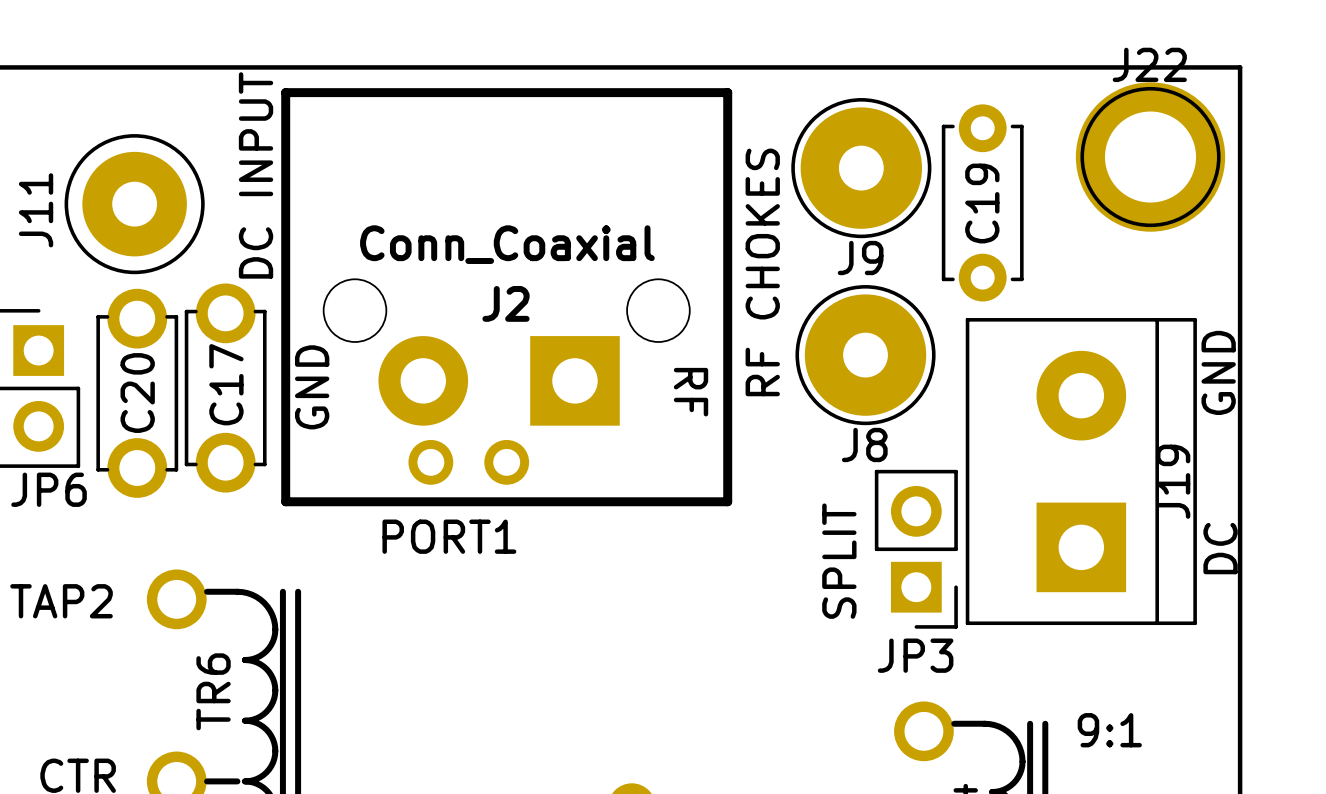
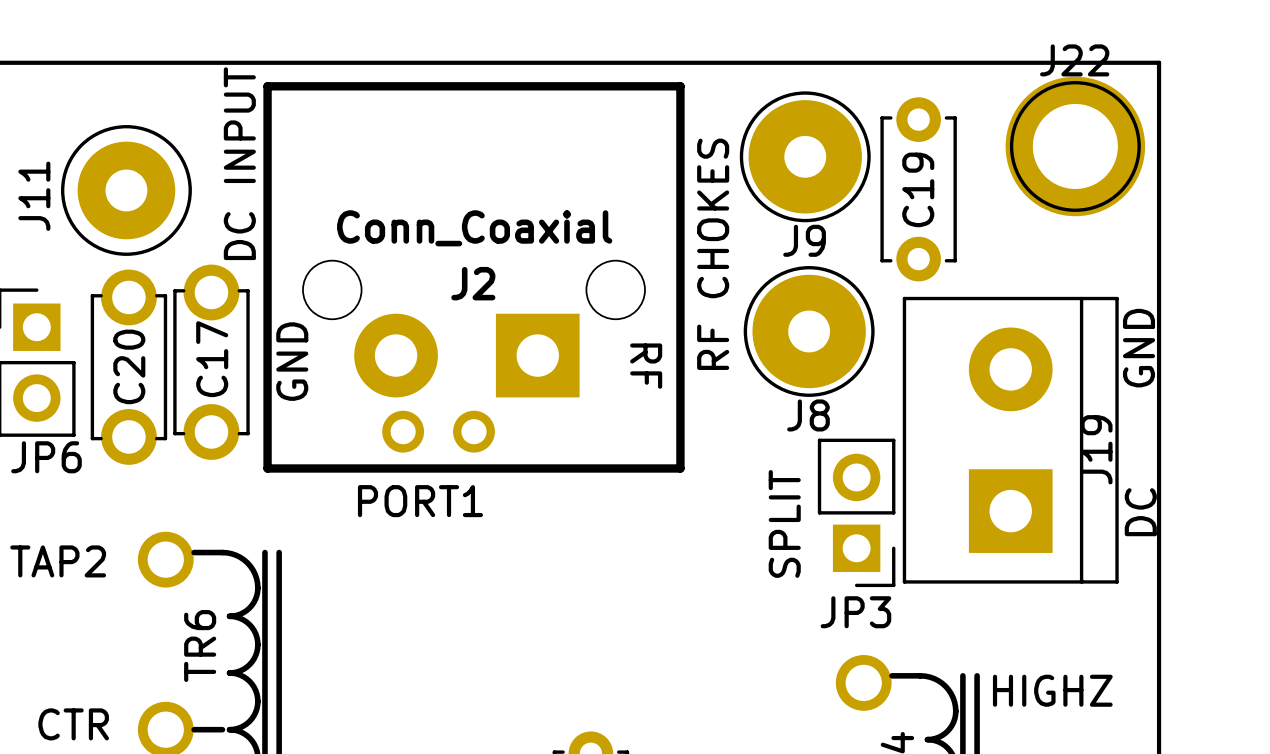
text: 9:1 (1109, 730) -> HIGHZ (1052, 690)

